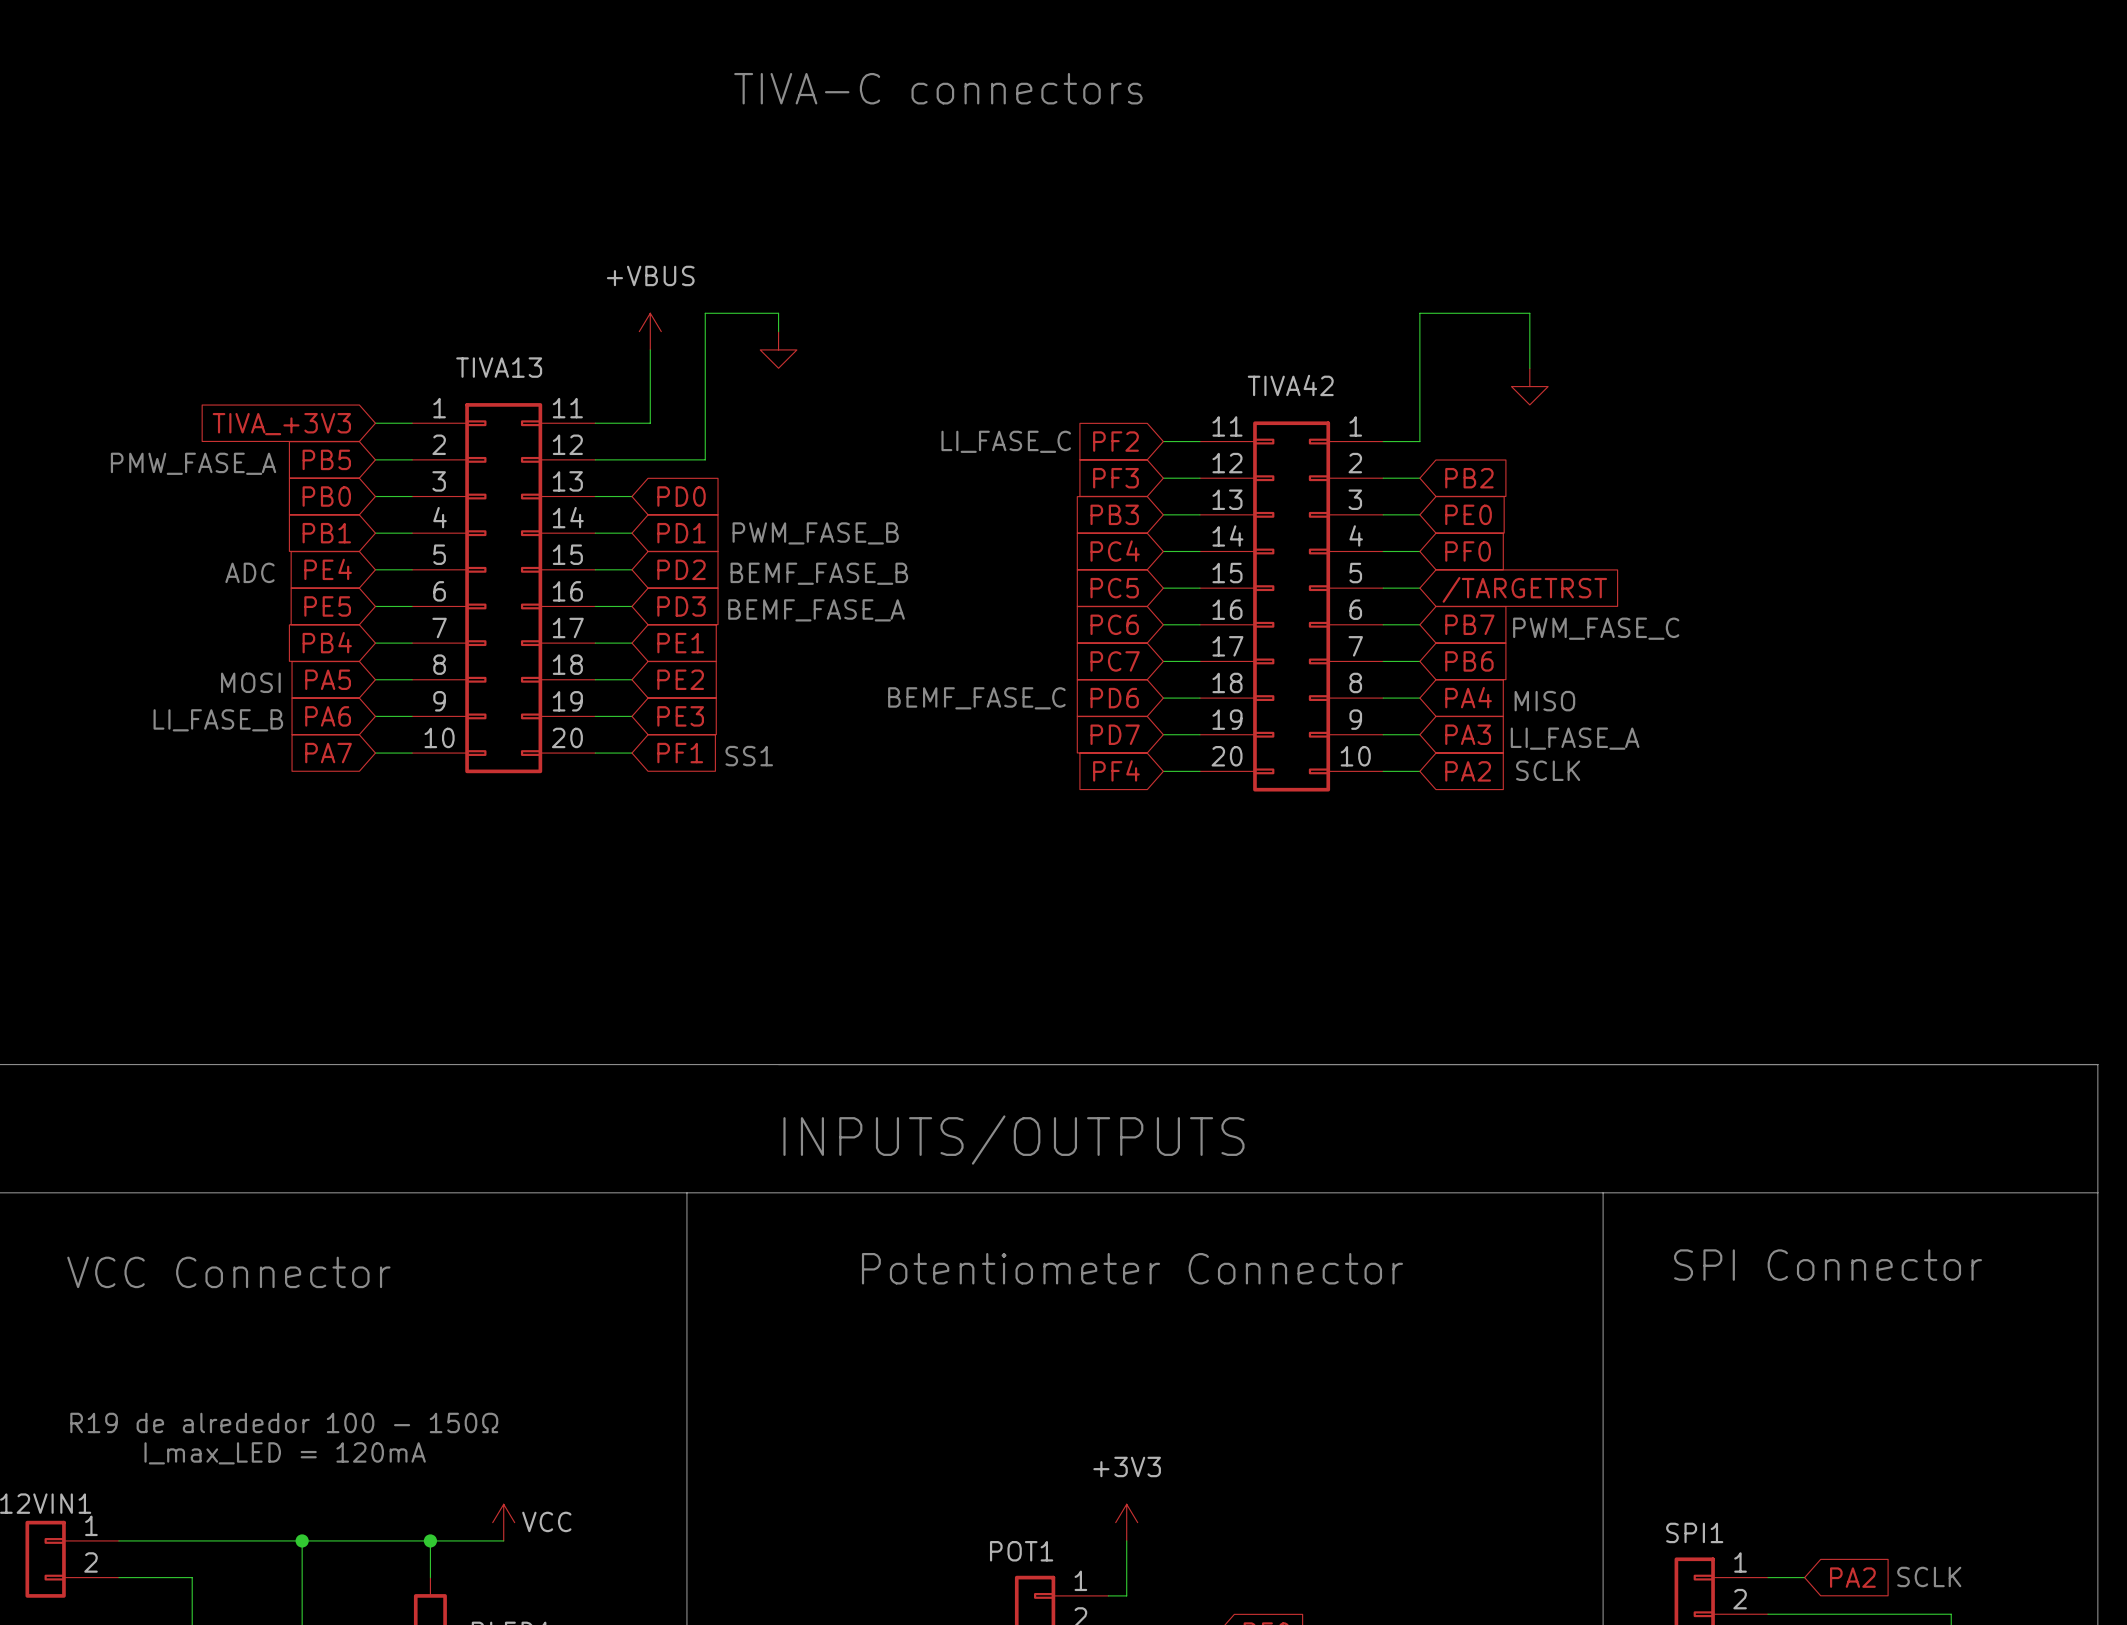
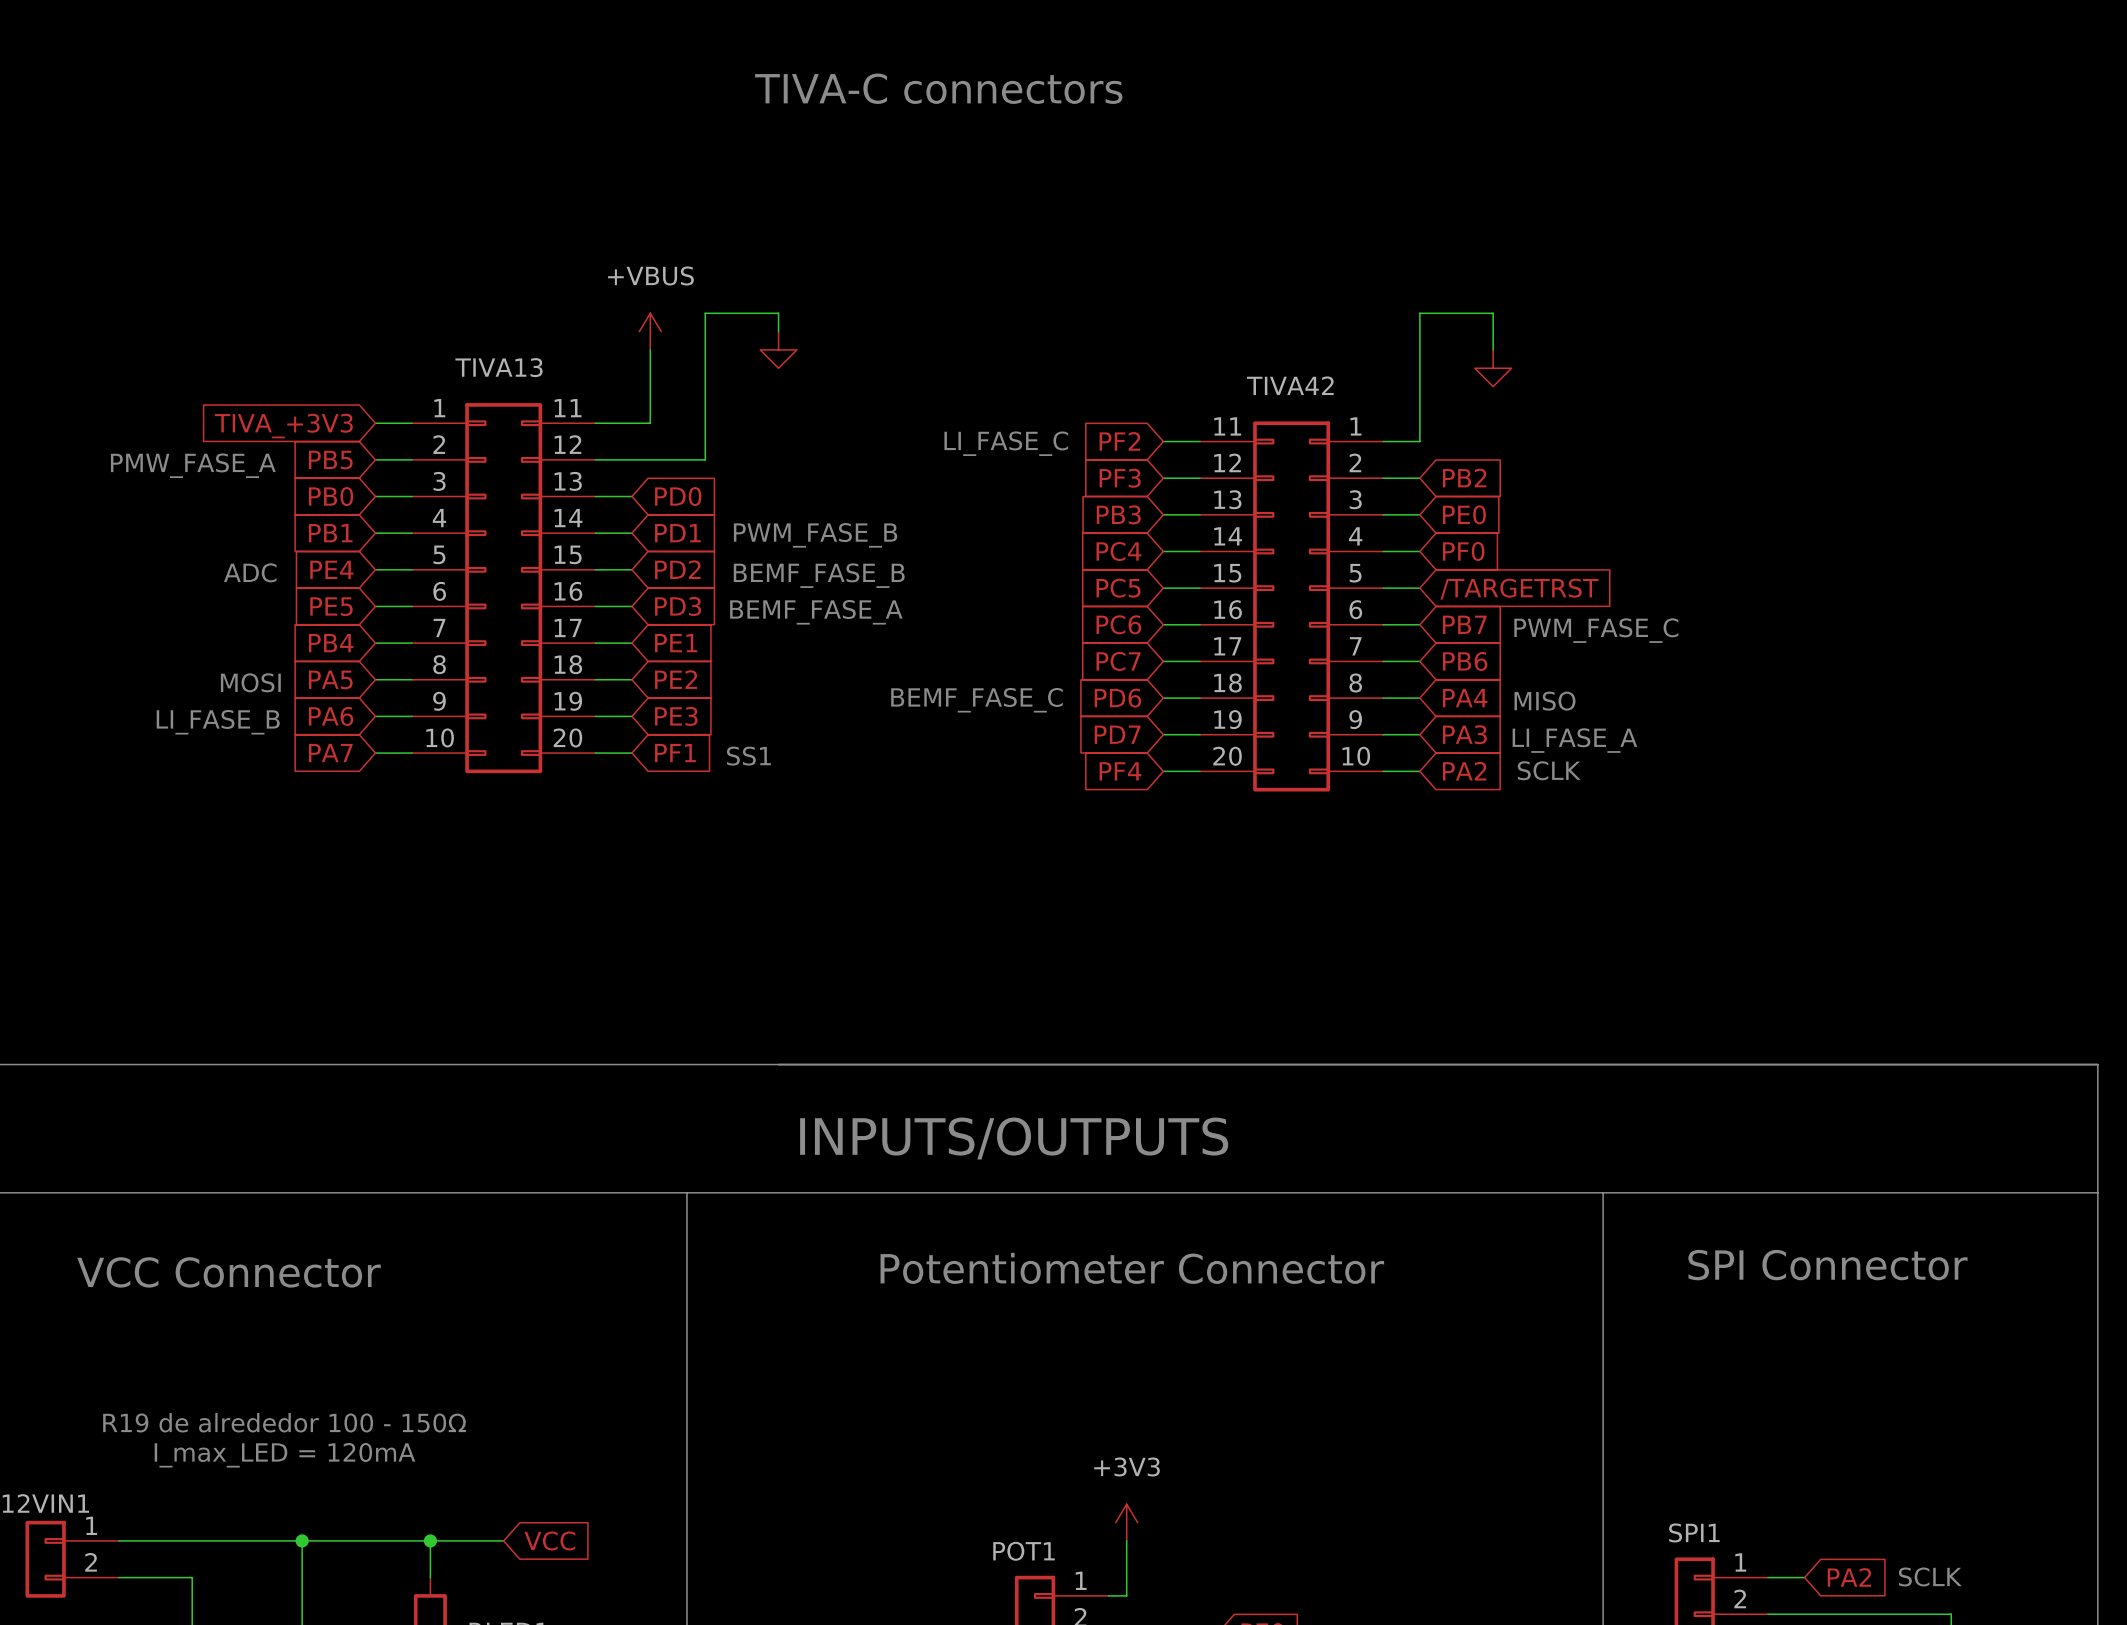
wire: (1493, 313) (1529, 313) (1529, 368) -> (1493, 313) (1493, 349)
power symbol position: (1529, 386) -> (1493, 368)
power symbol: VCC (503, 1522) -> none
global label: none -> VCC (549, 1540)

